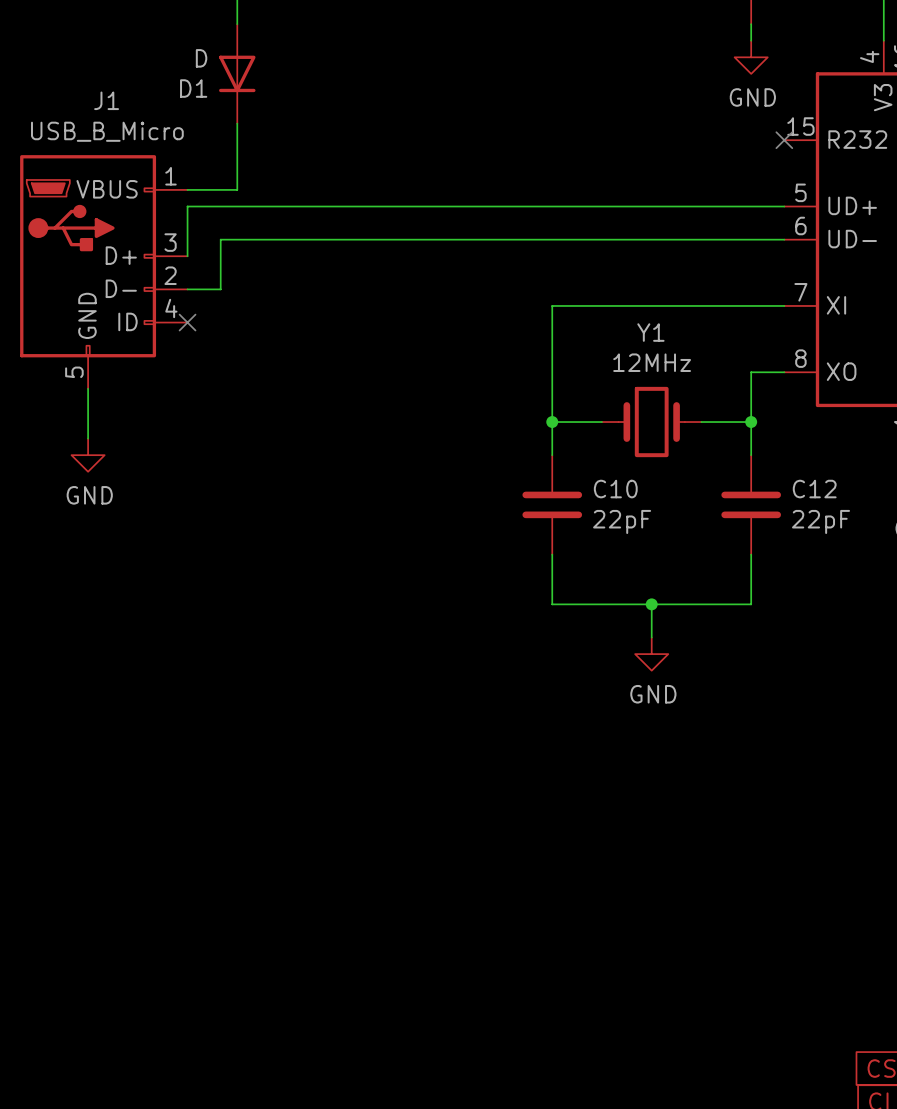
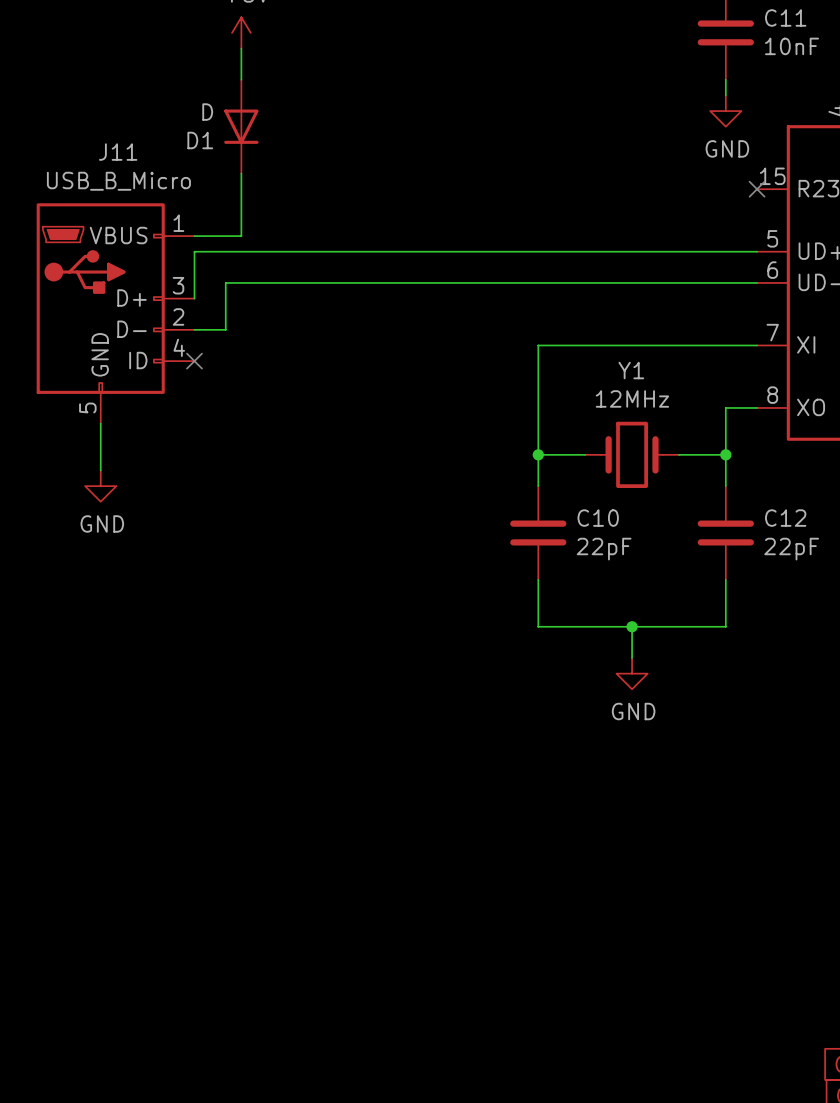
J1 name: J1 (106, 100) -> J11 (118, 152)

